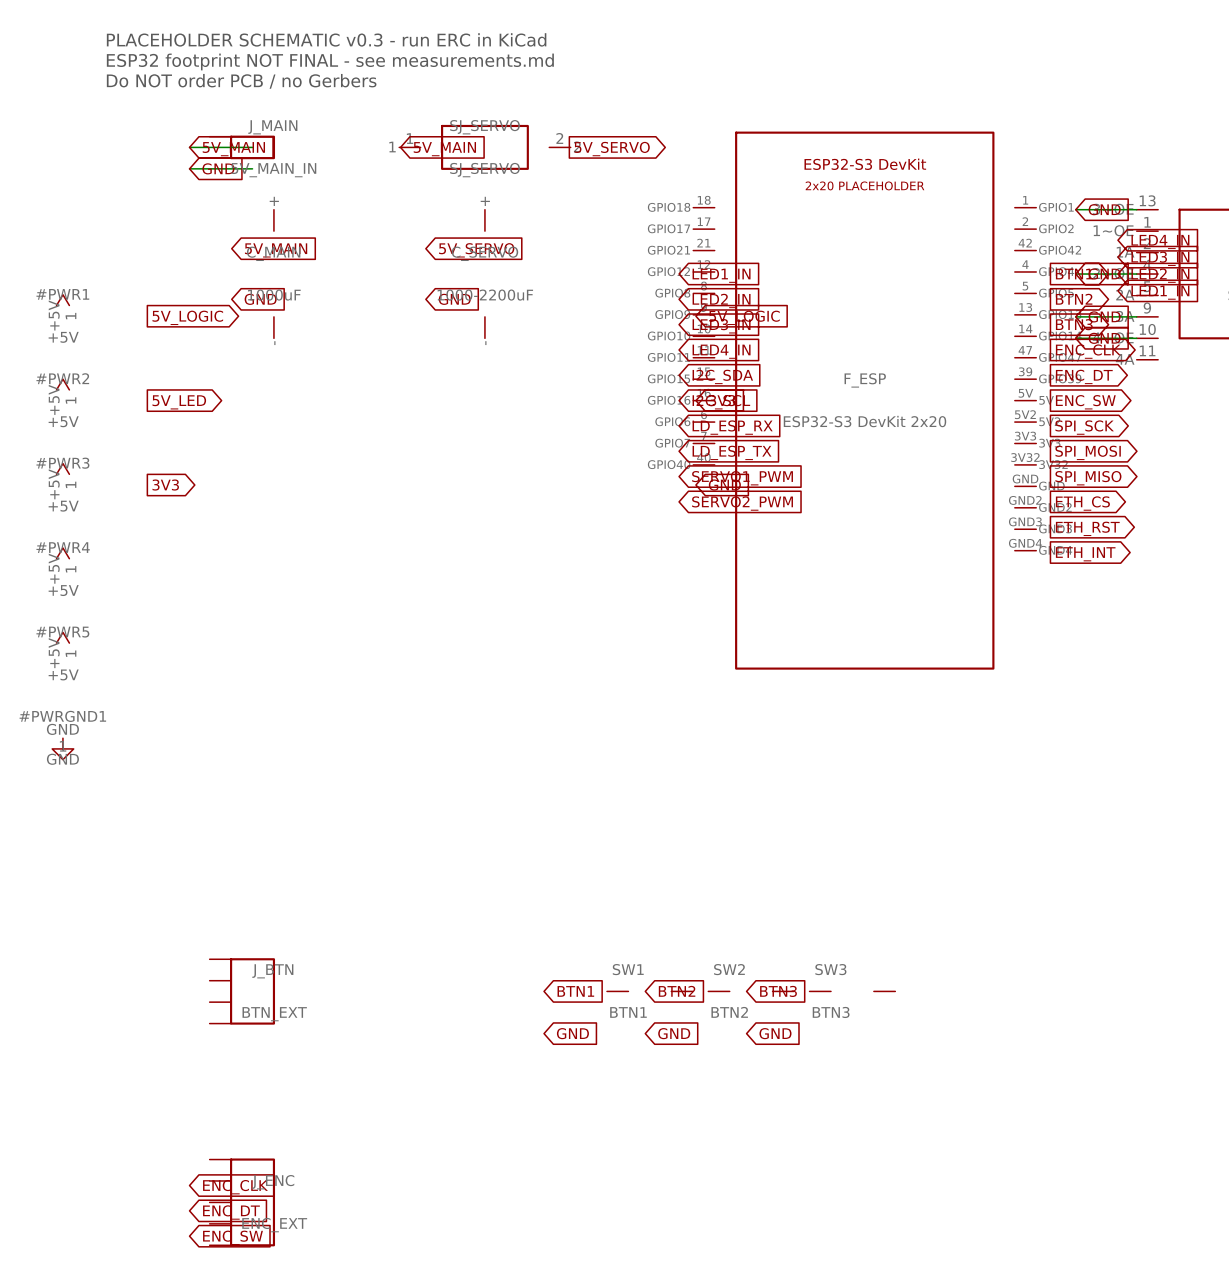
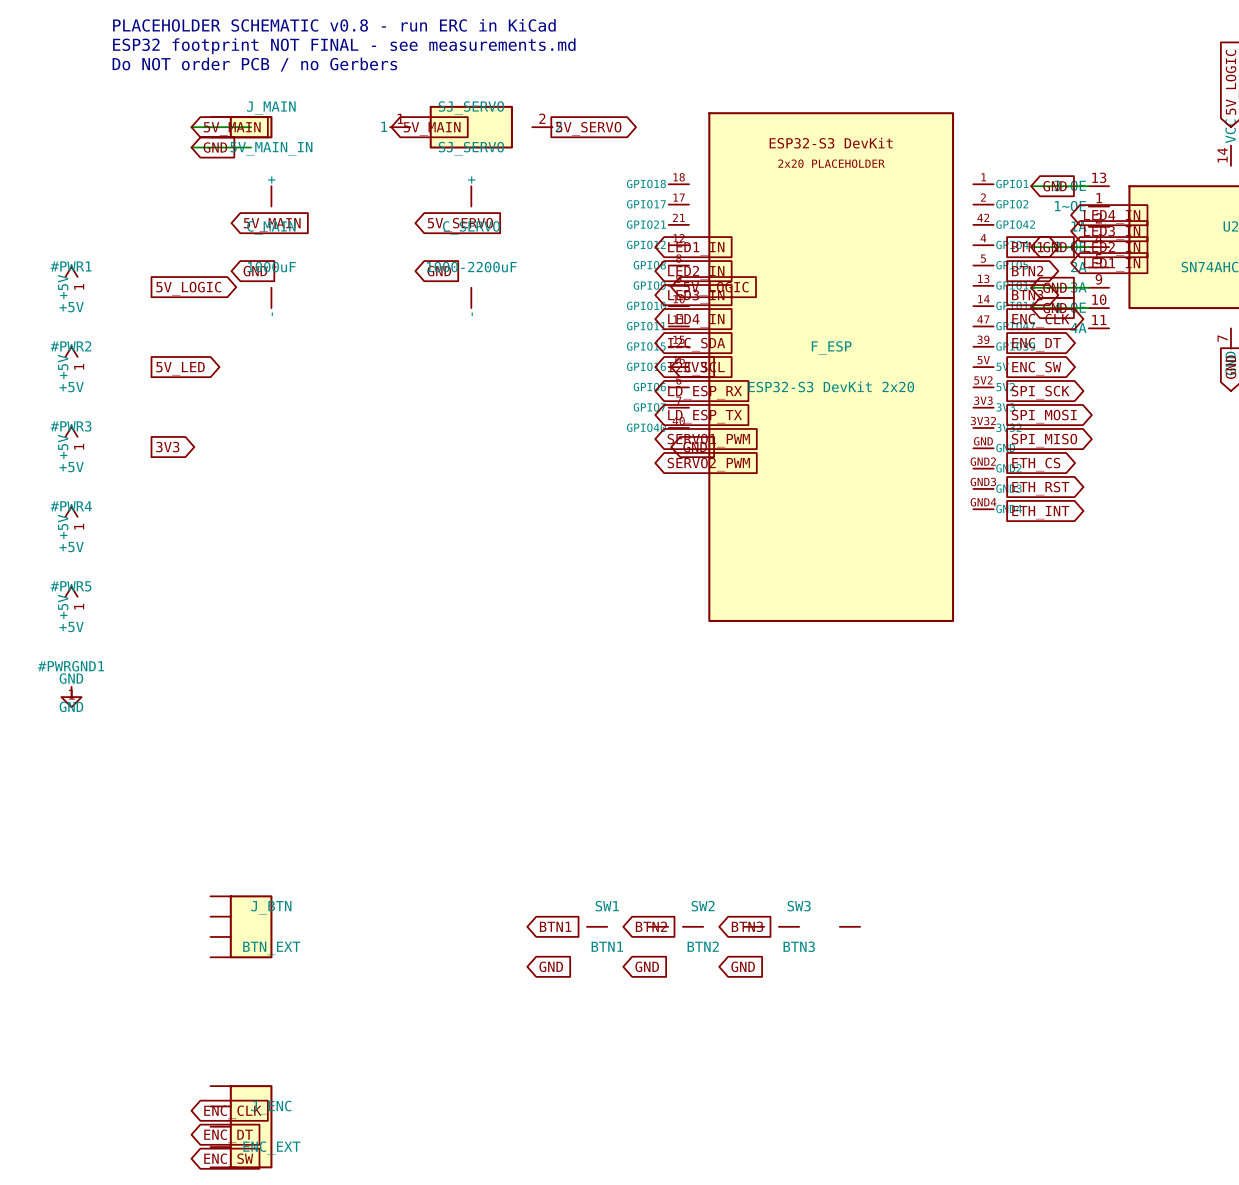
text: PLACEHOLDER SCHEMATIC v0.3 - run ERC in KiCad (326, 39) -> PLACEHOLDER SCHEMATIC v0.8 - run ERC in KiCad (334, 25)

